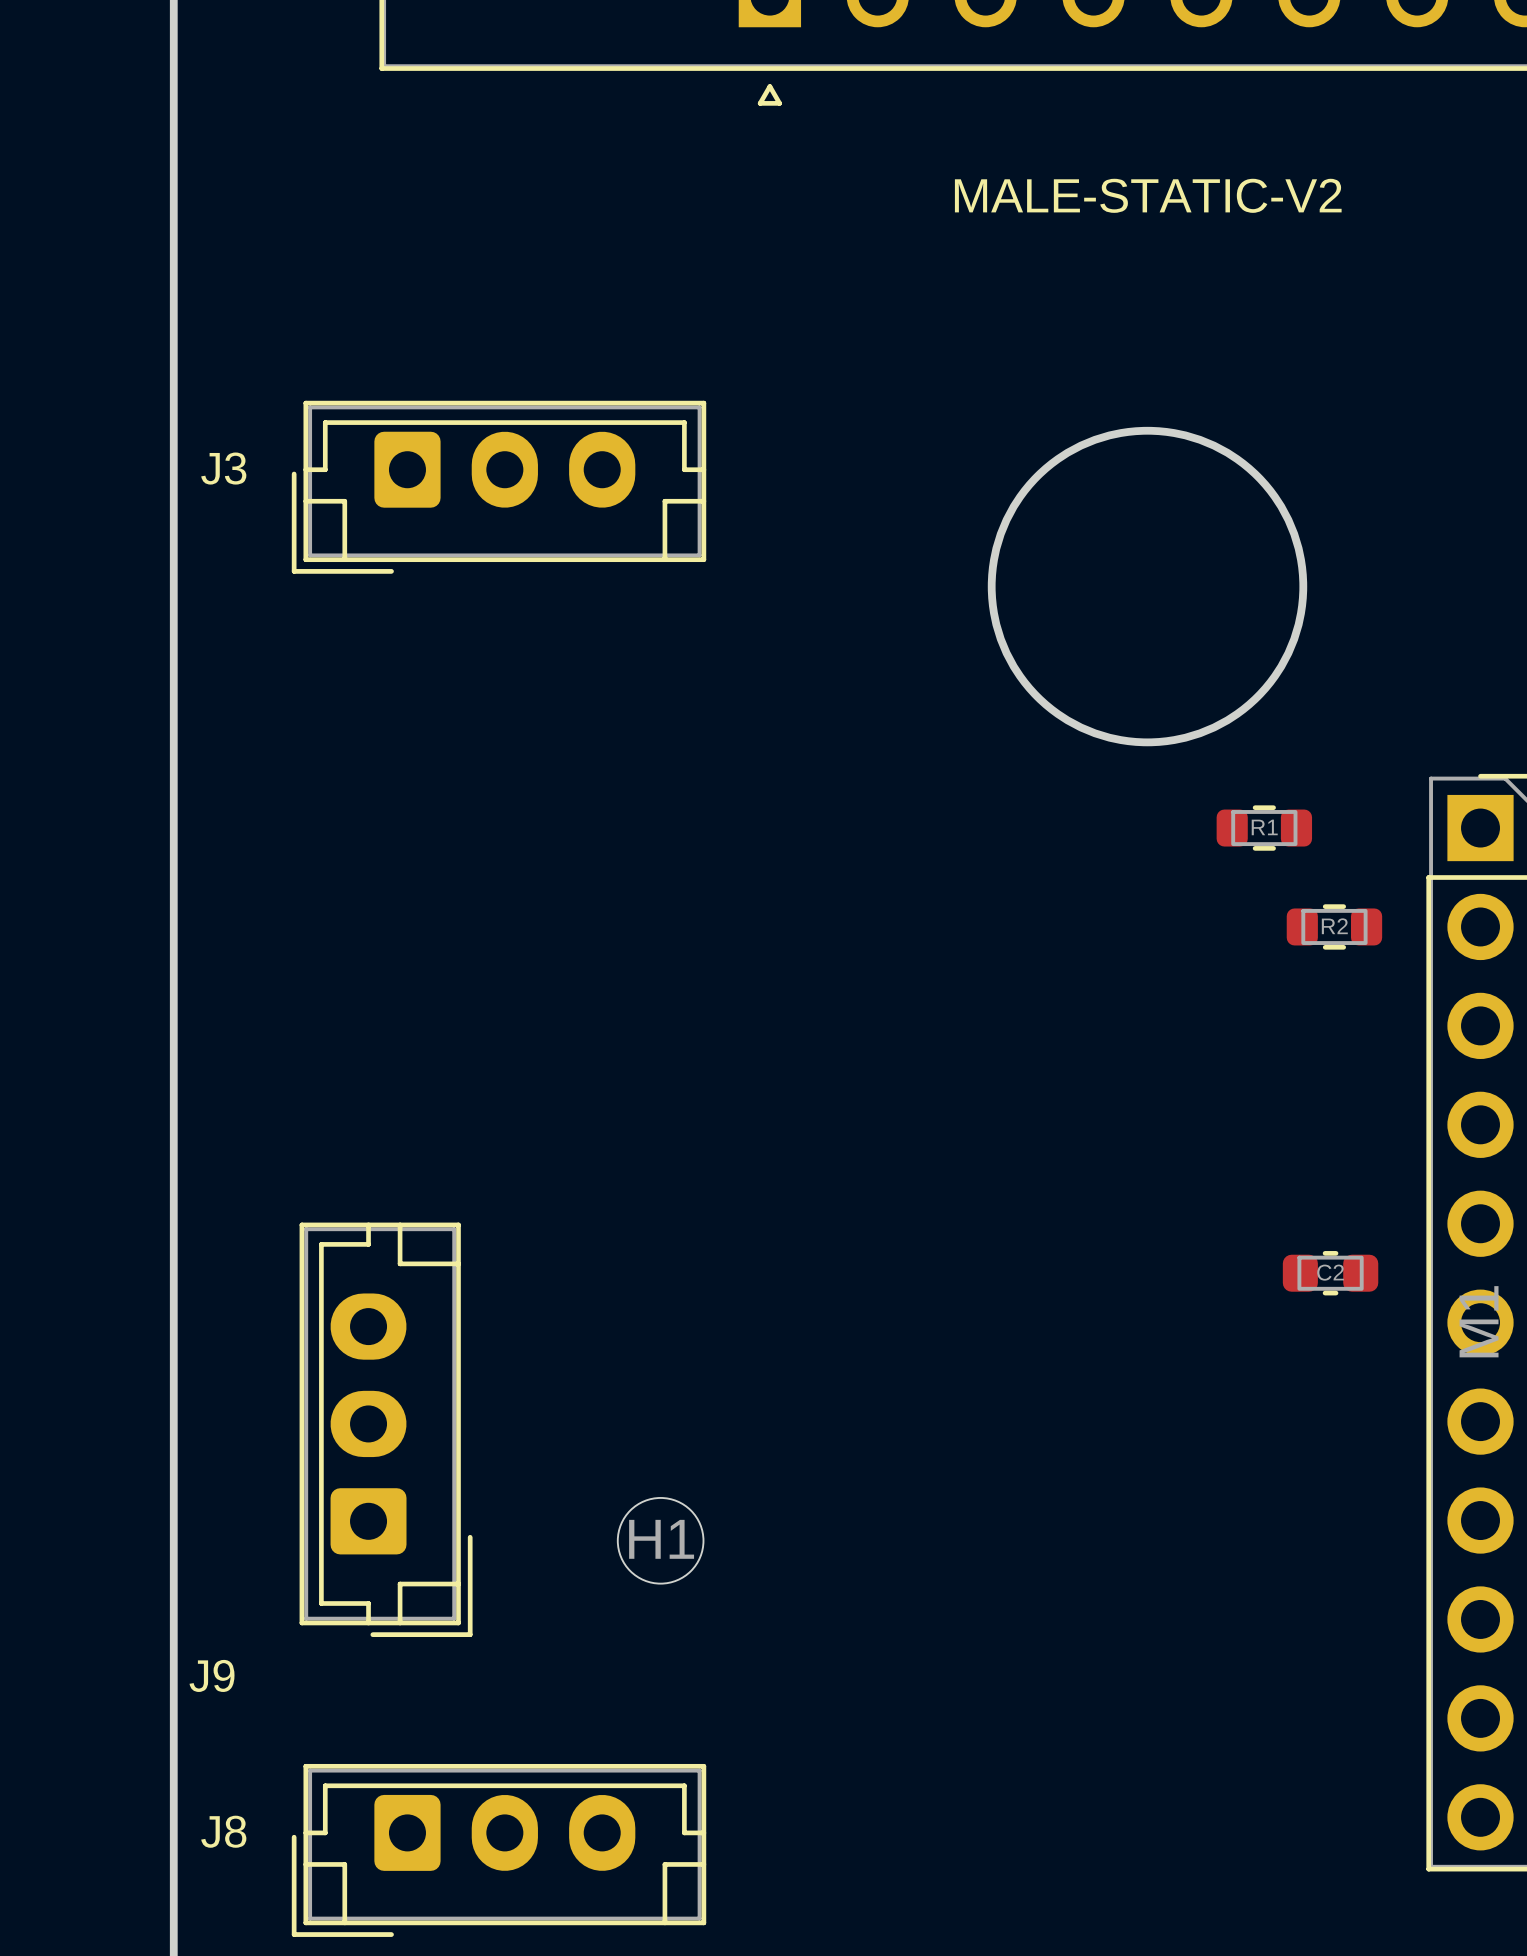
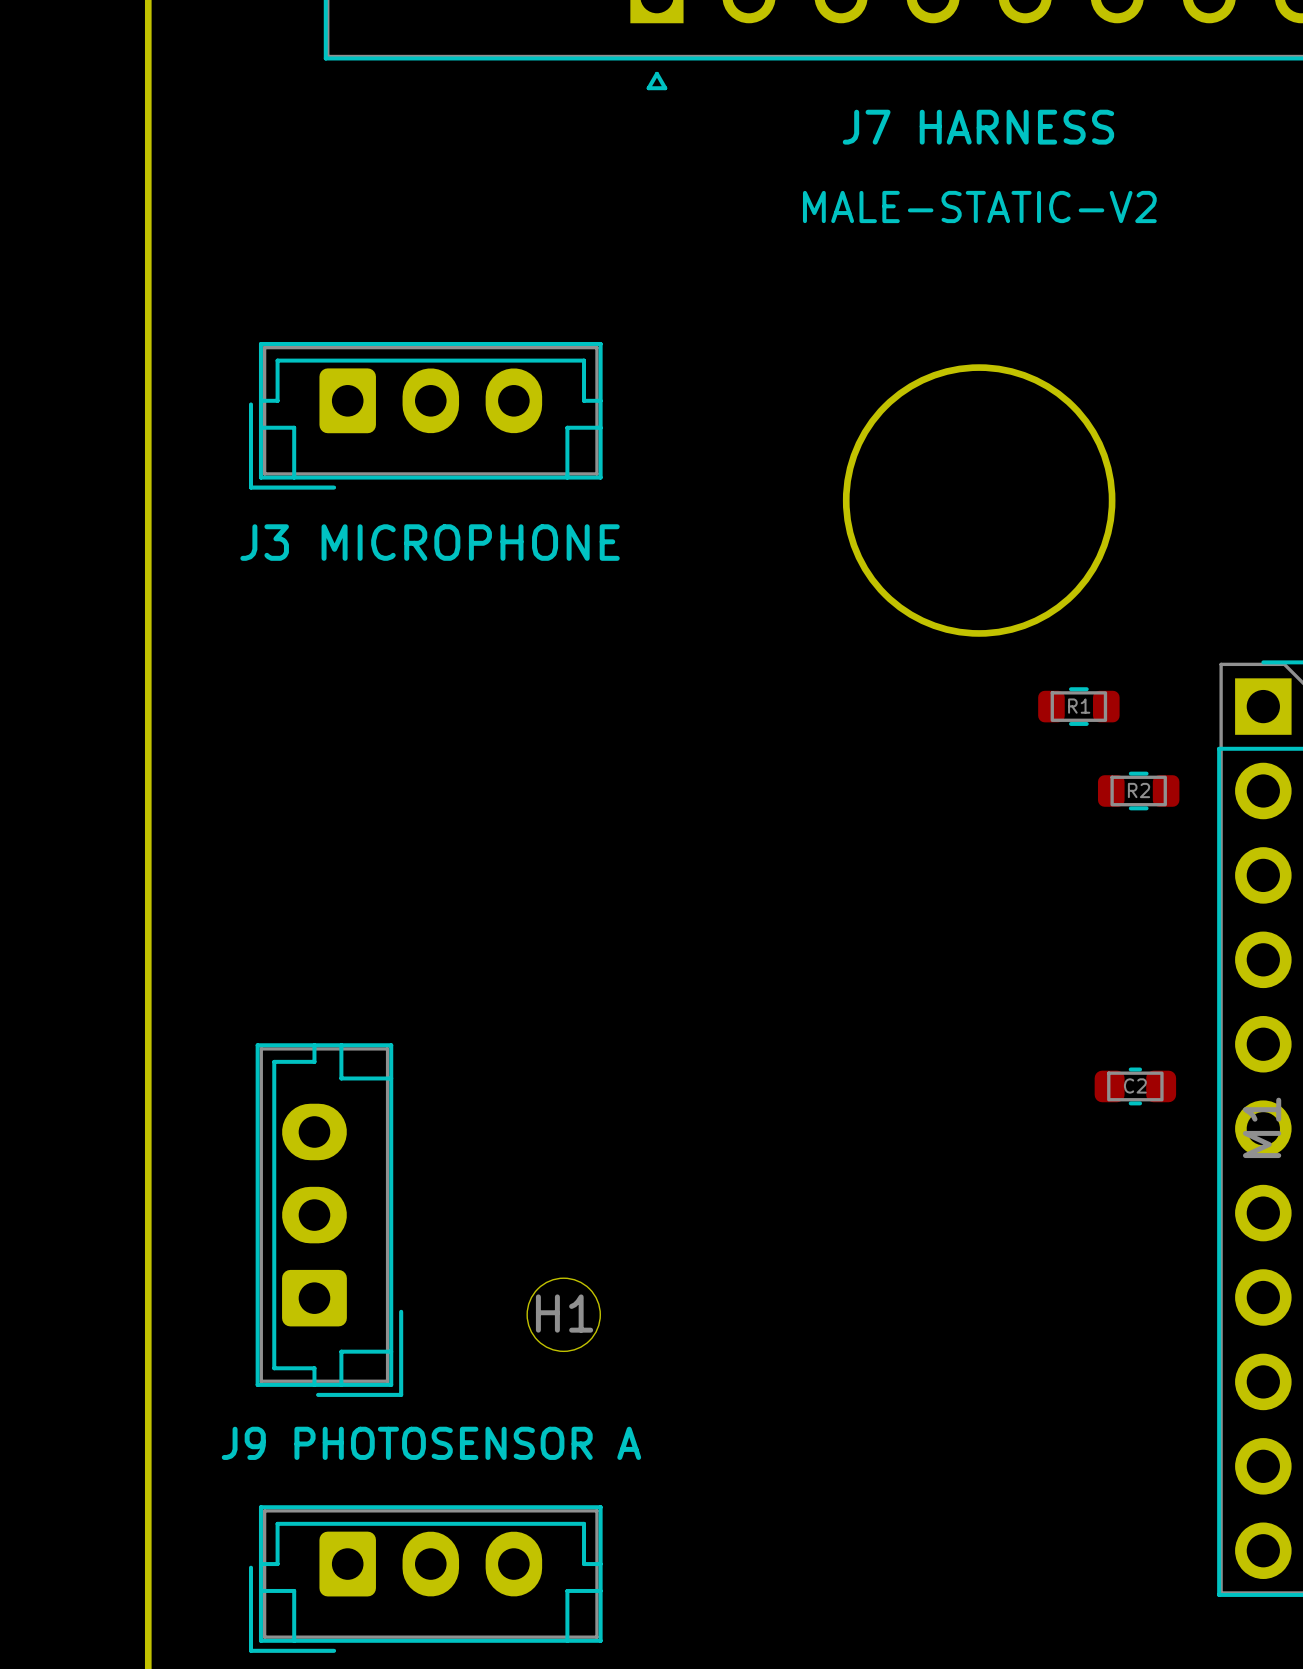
text: none -> J7 HARNESS (978, 127)
text position: MALE-STATIC-V2 (1148, 195) -> MALE-STATIC-V2 (979, 206)
text: J3 (223, 468) -> none
text: none -> J3 MICROPHONE (430, 542)
text: J9 (212, 1675) -> none
text: none -> J9 PHOTOSENSOR A (431, 1443)
text: J8 (223, 1831) -> none

